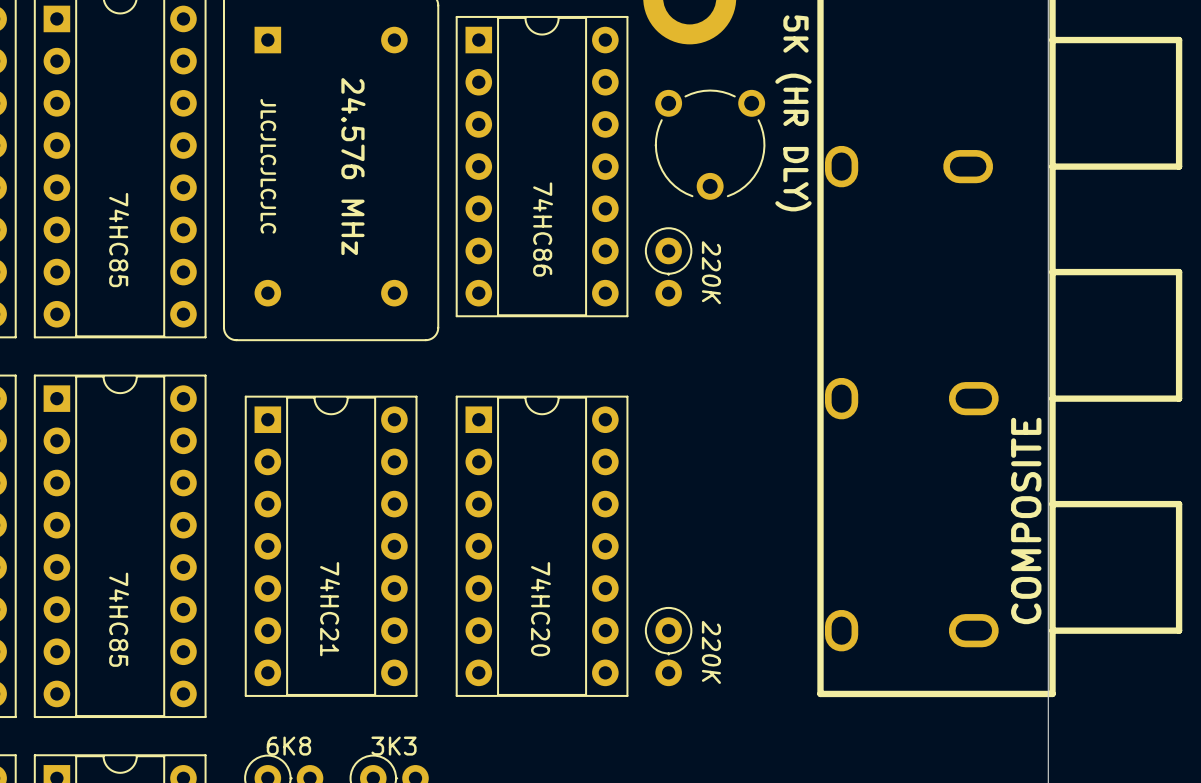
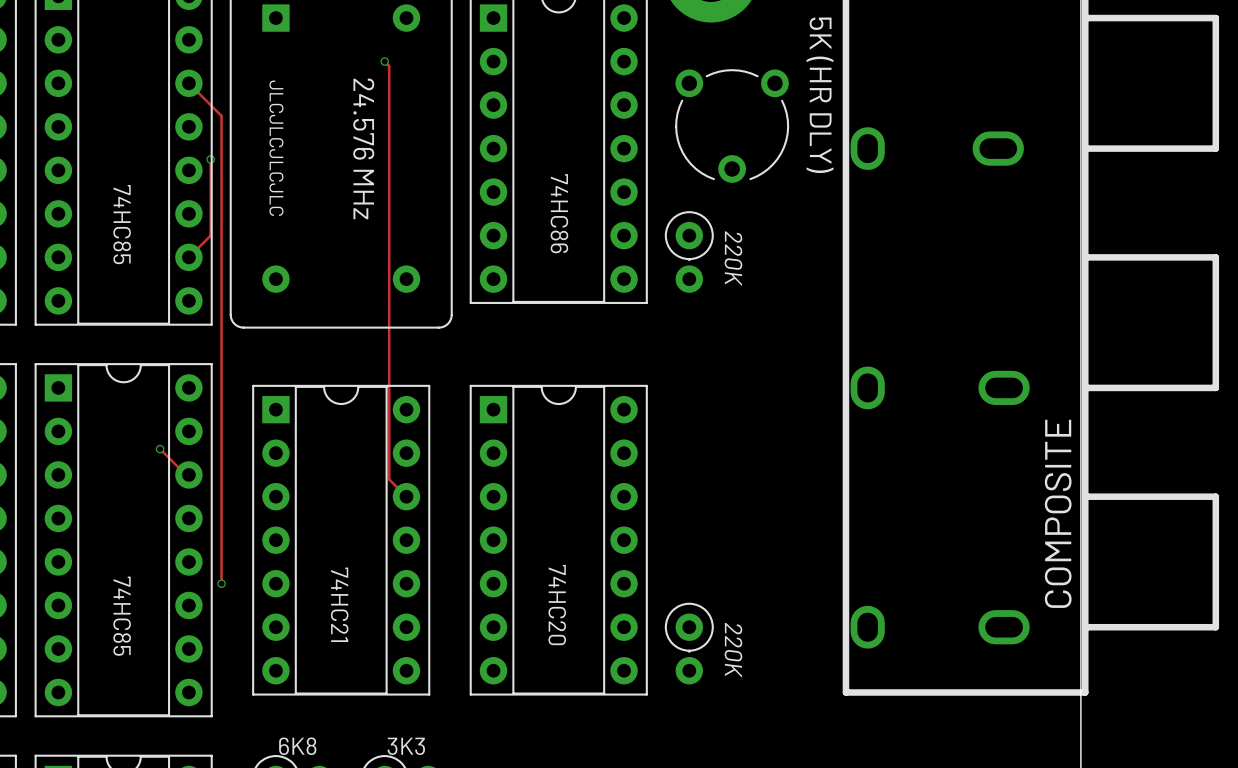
track: none -> (384, 61) (389, 66) (389, 479) (406, 496)
via: none -> (384, 61)
track: none -> (188, 83) (221, 115) (221, 583)
track: none -> (210, 159) (210, 235) (188, 257)
via: none -> (210, 159)
track: none -> (160, 449) (185, 474) (188, 474)
via: none -> (160, 449)
via: none -> (221, 583)

